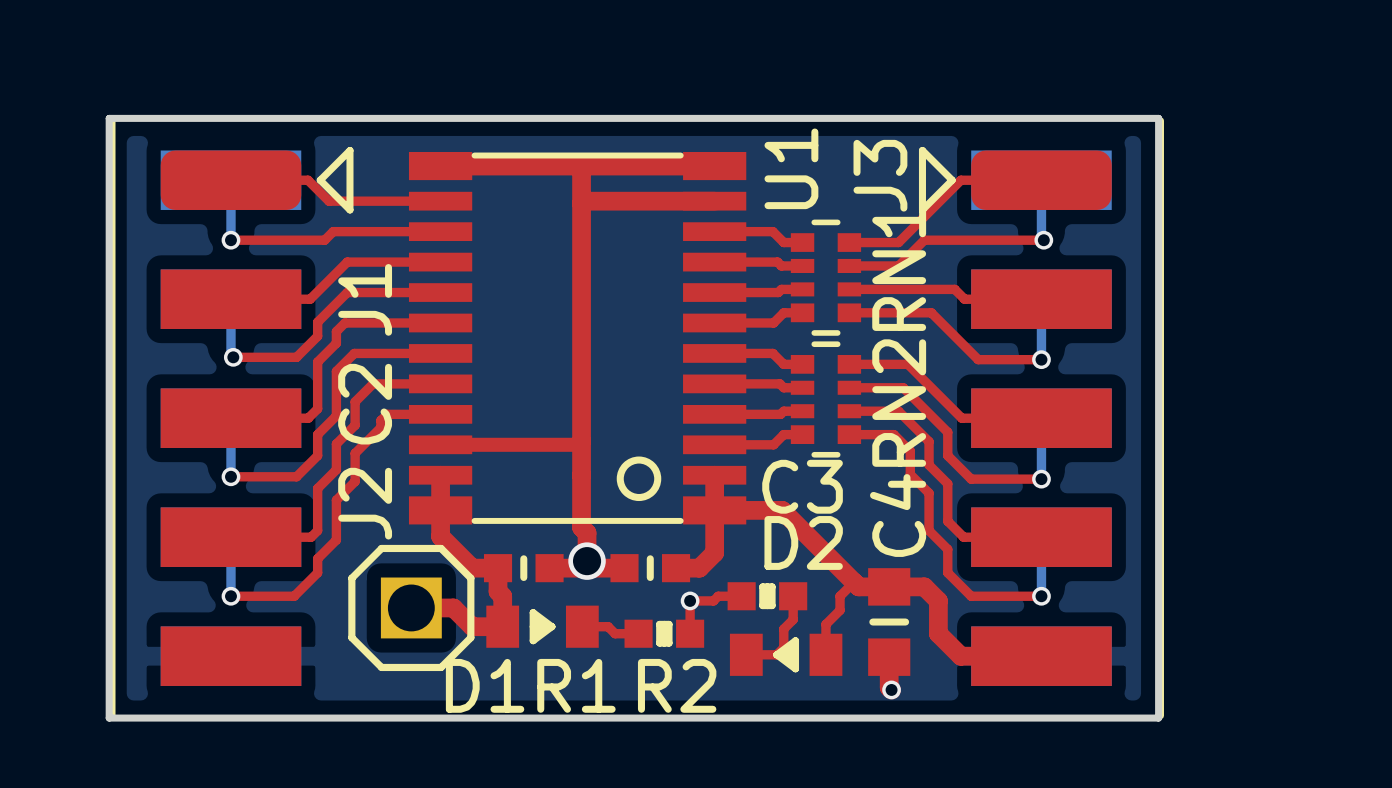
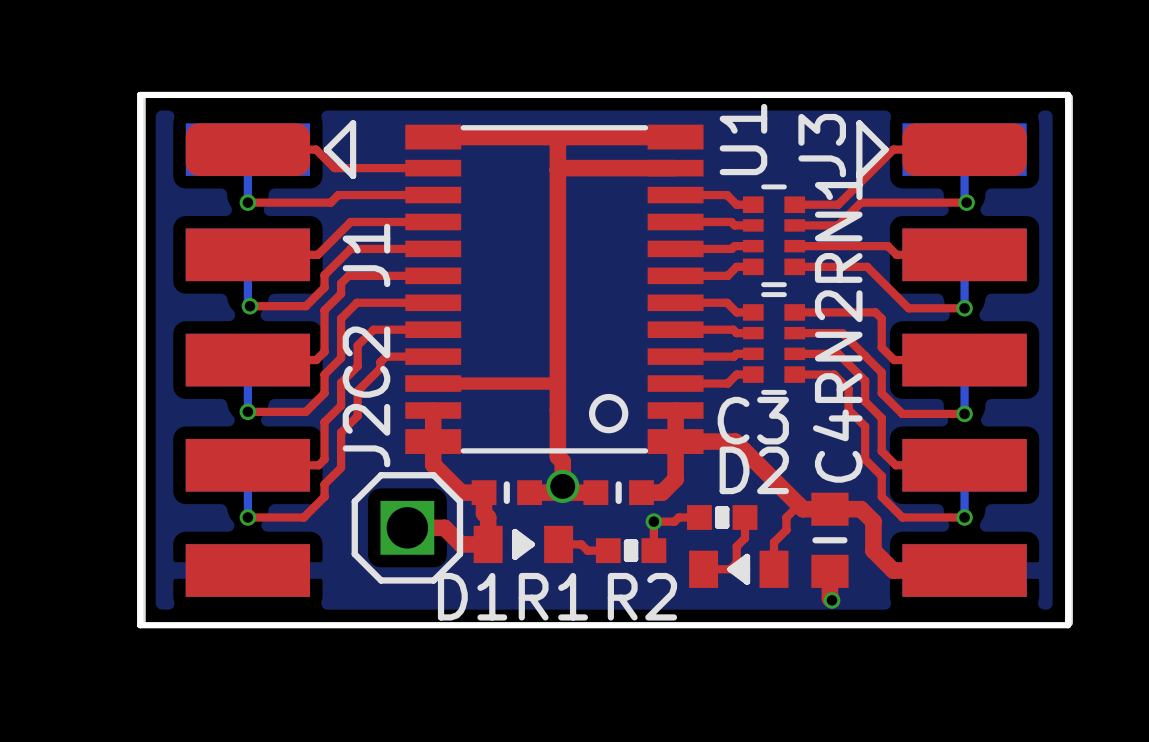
top track: (907, 364) (947, 404) -> (846, 312) (875, 312) (881, 318) (881, 347)
C2 name position: C2 (365, 404) -> C2 (366, 362)

